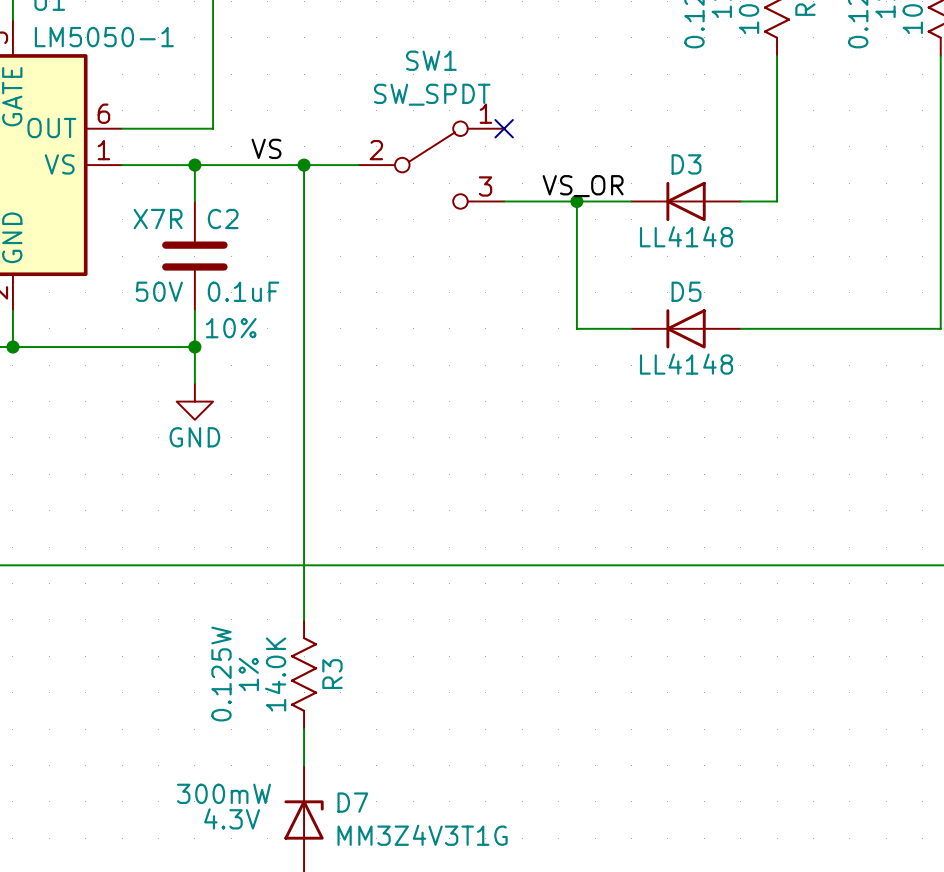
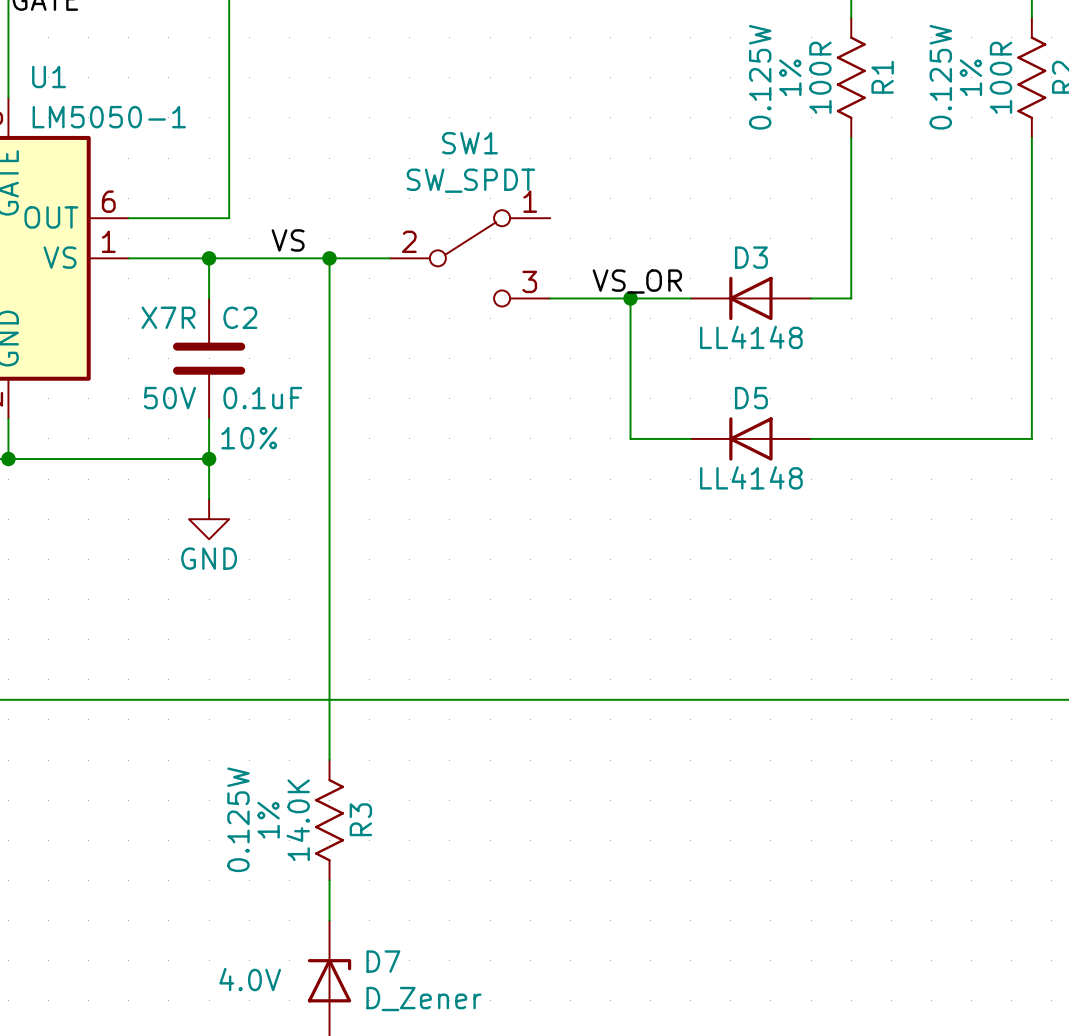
no-connect mark: (504, 128) -> none
D7 text: 300mW (223, 793) -> none
D7 text: 4.3V (232, 818) -> 4.0V (250, 979)
D7 value: MM3Z4V3T1G (422, 835) -> D_Zener (423, 999)

